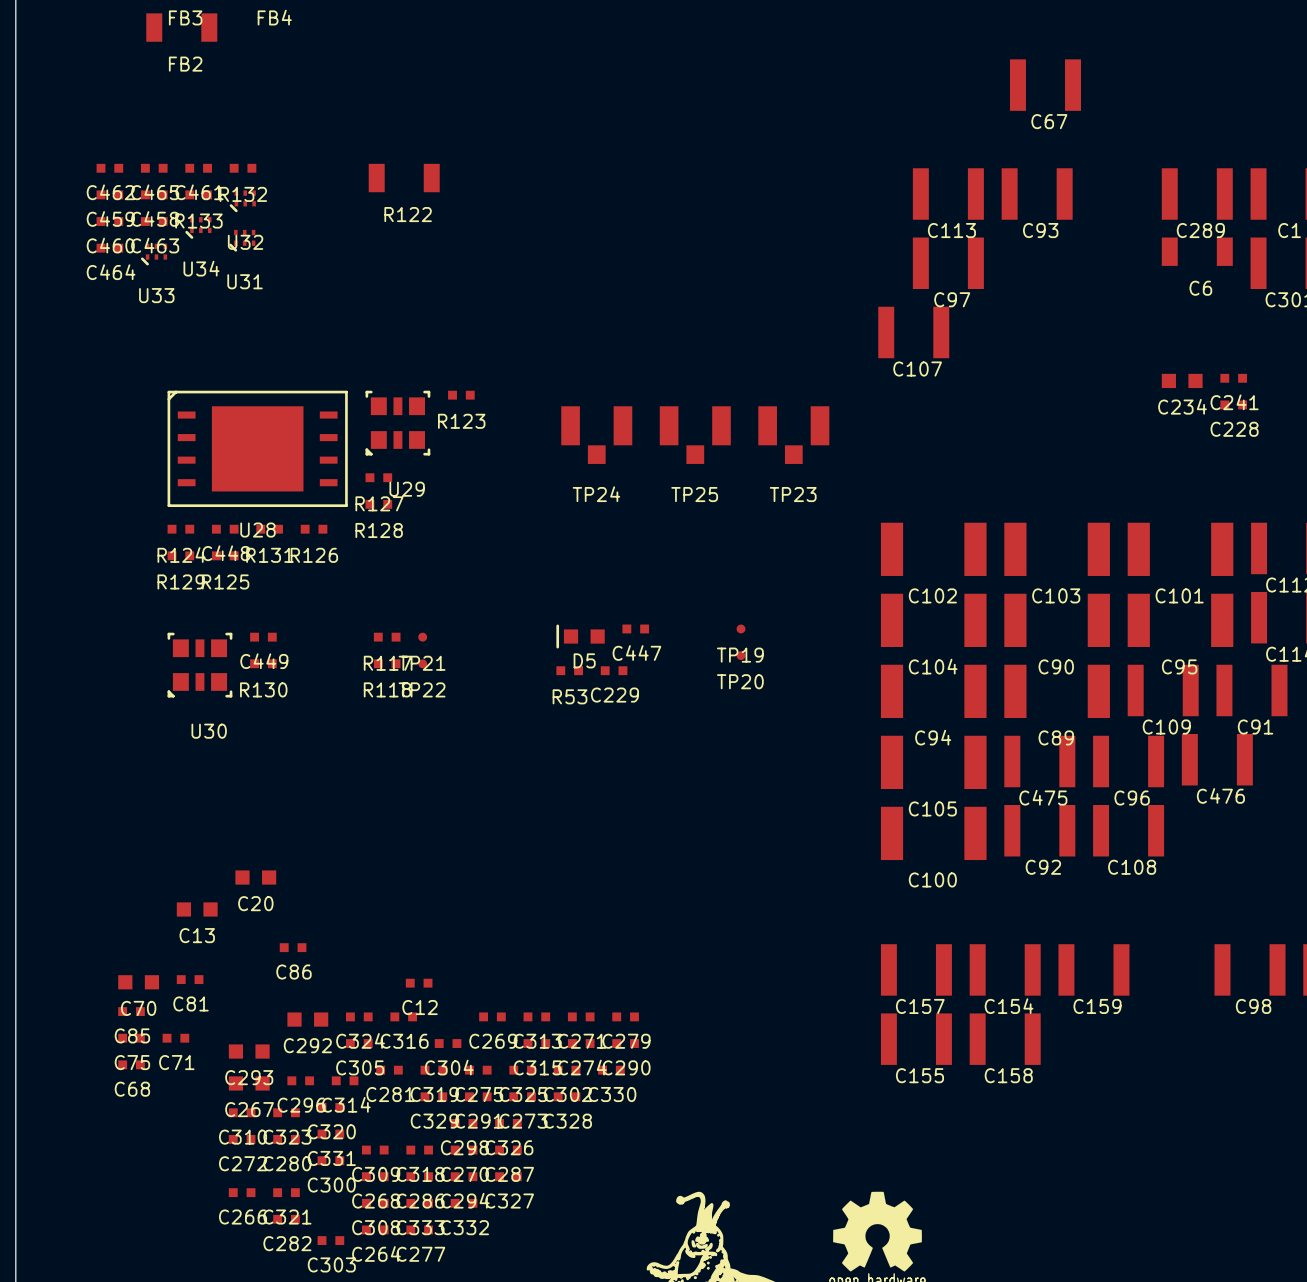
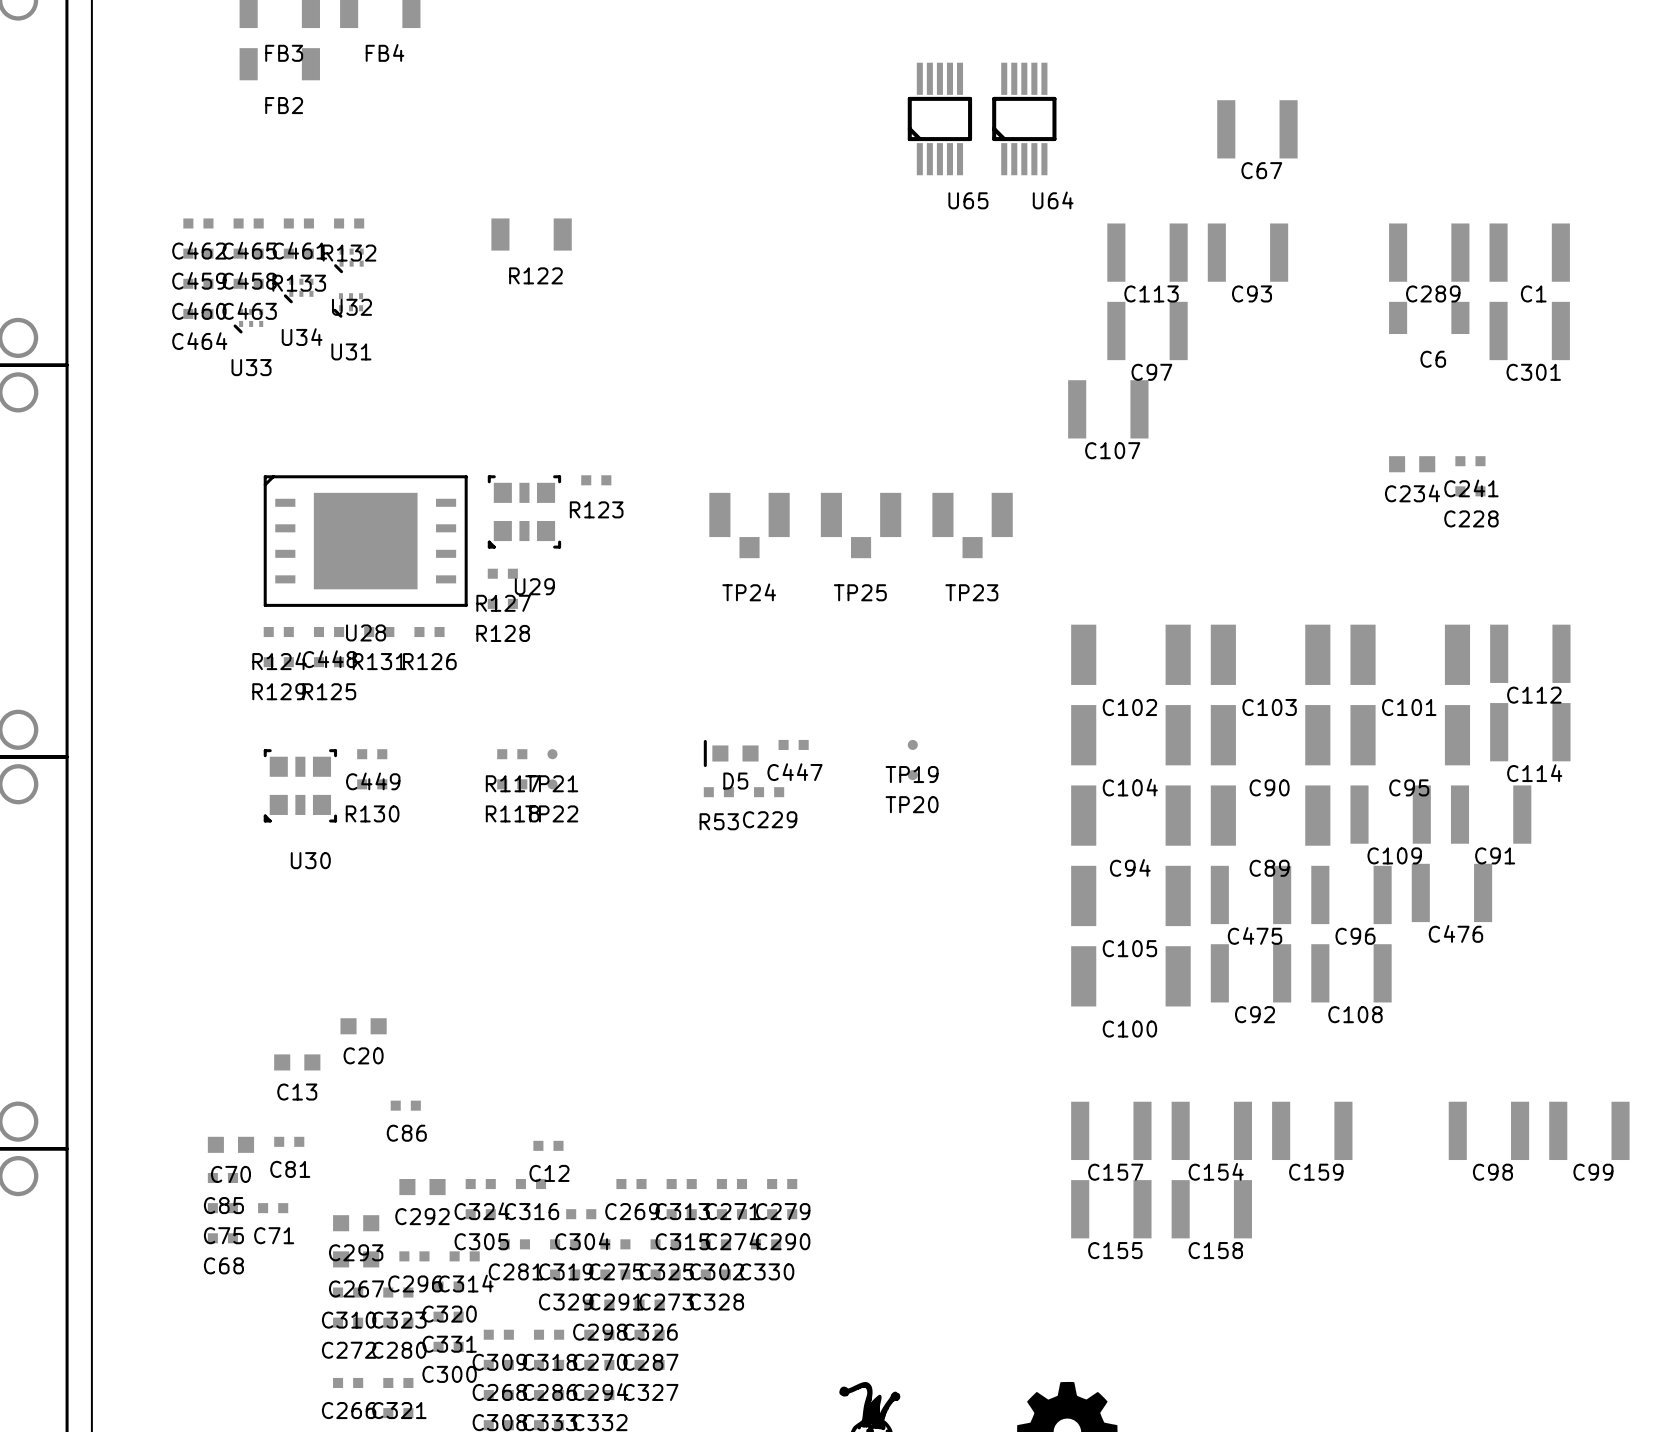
U65: none -> (939, 118)
U64: none -> (1024, 118)

